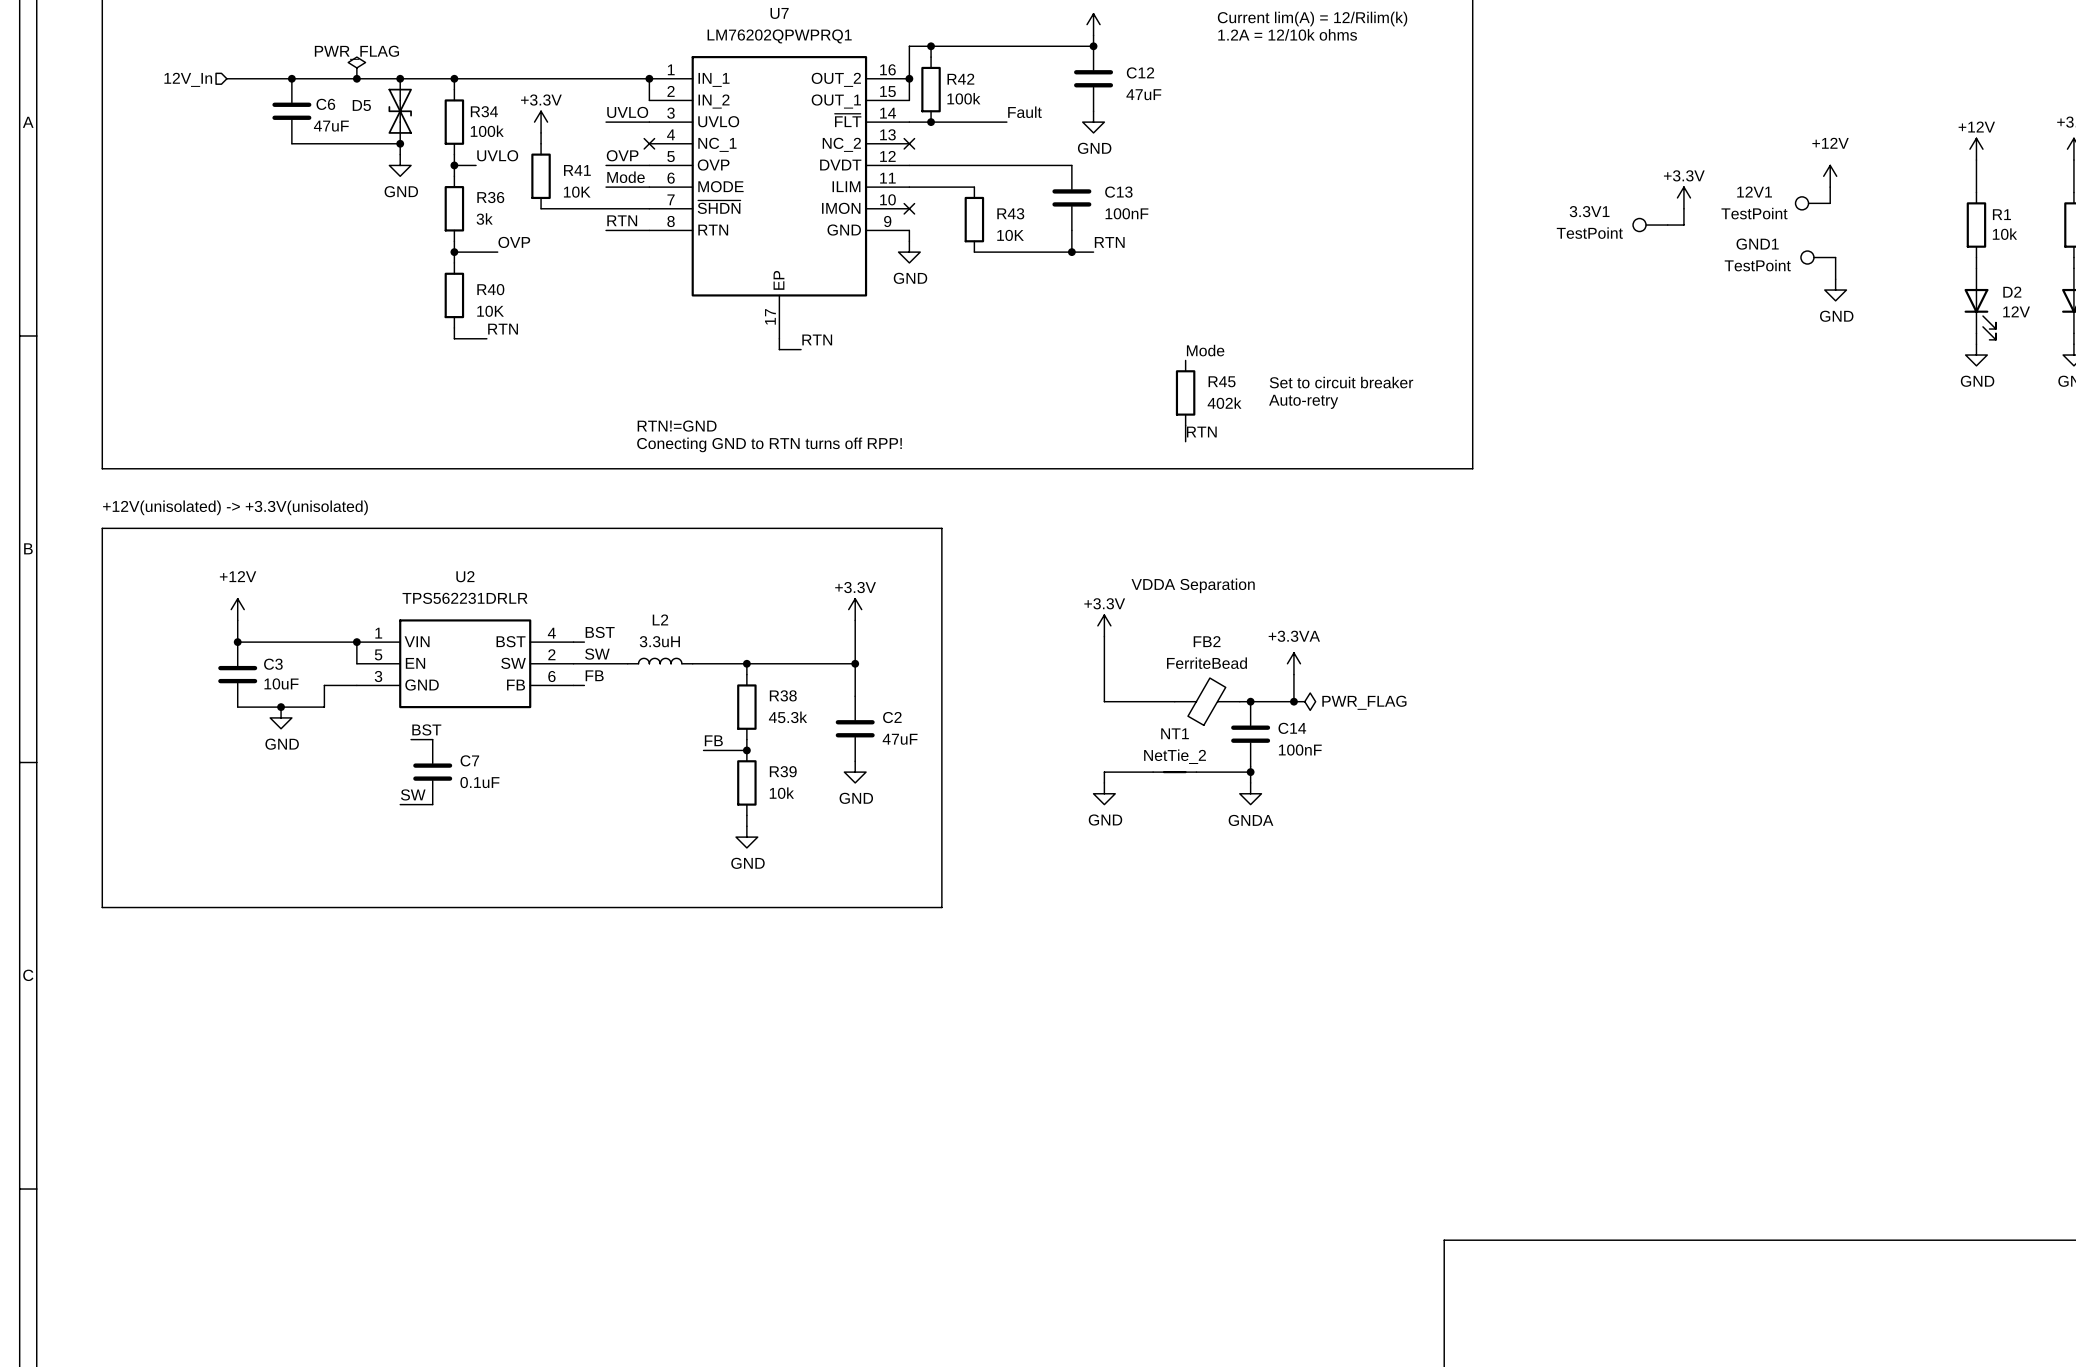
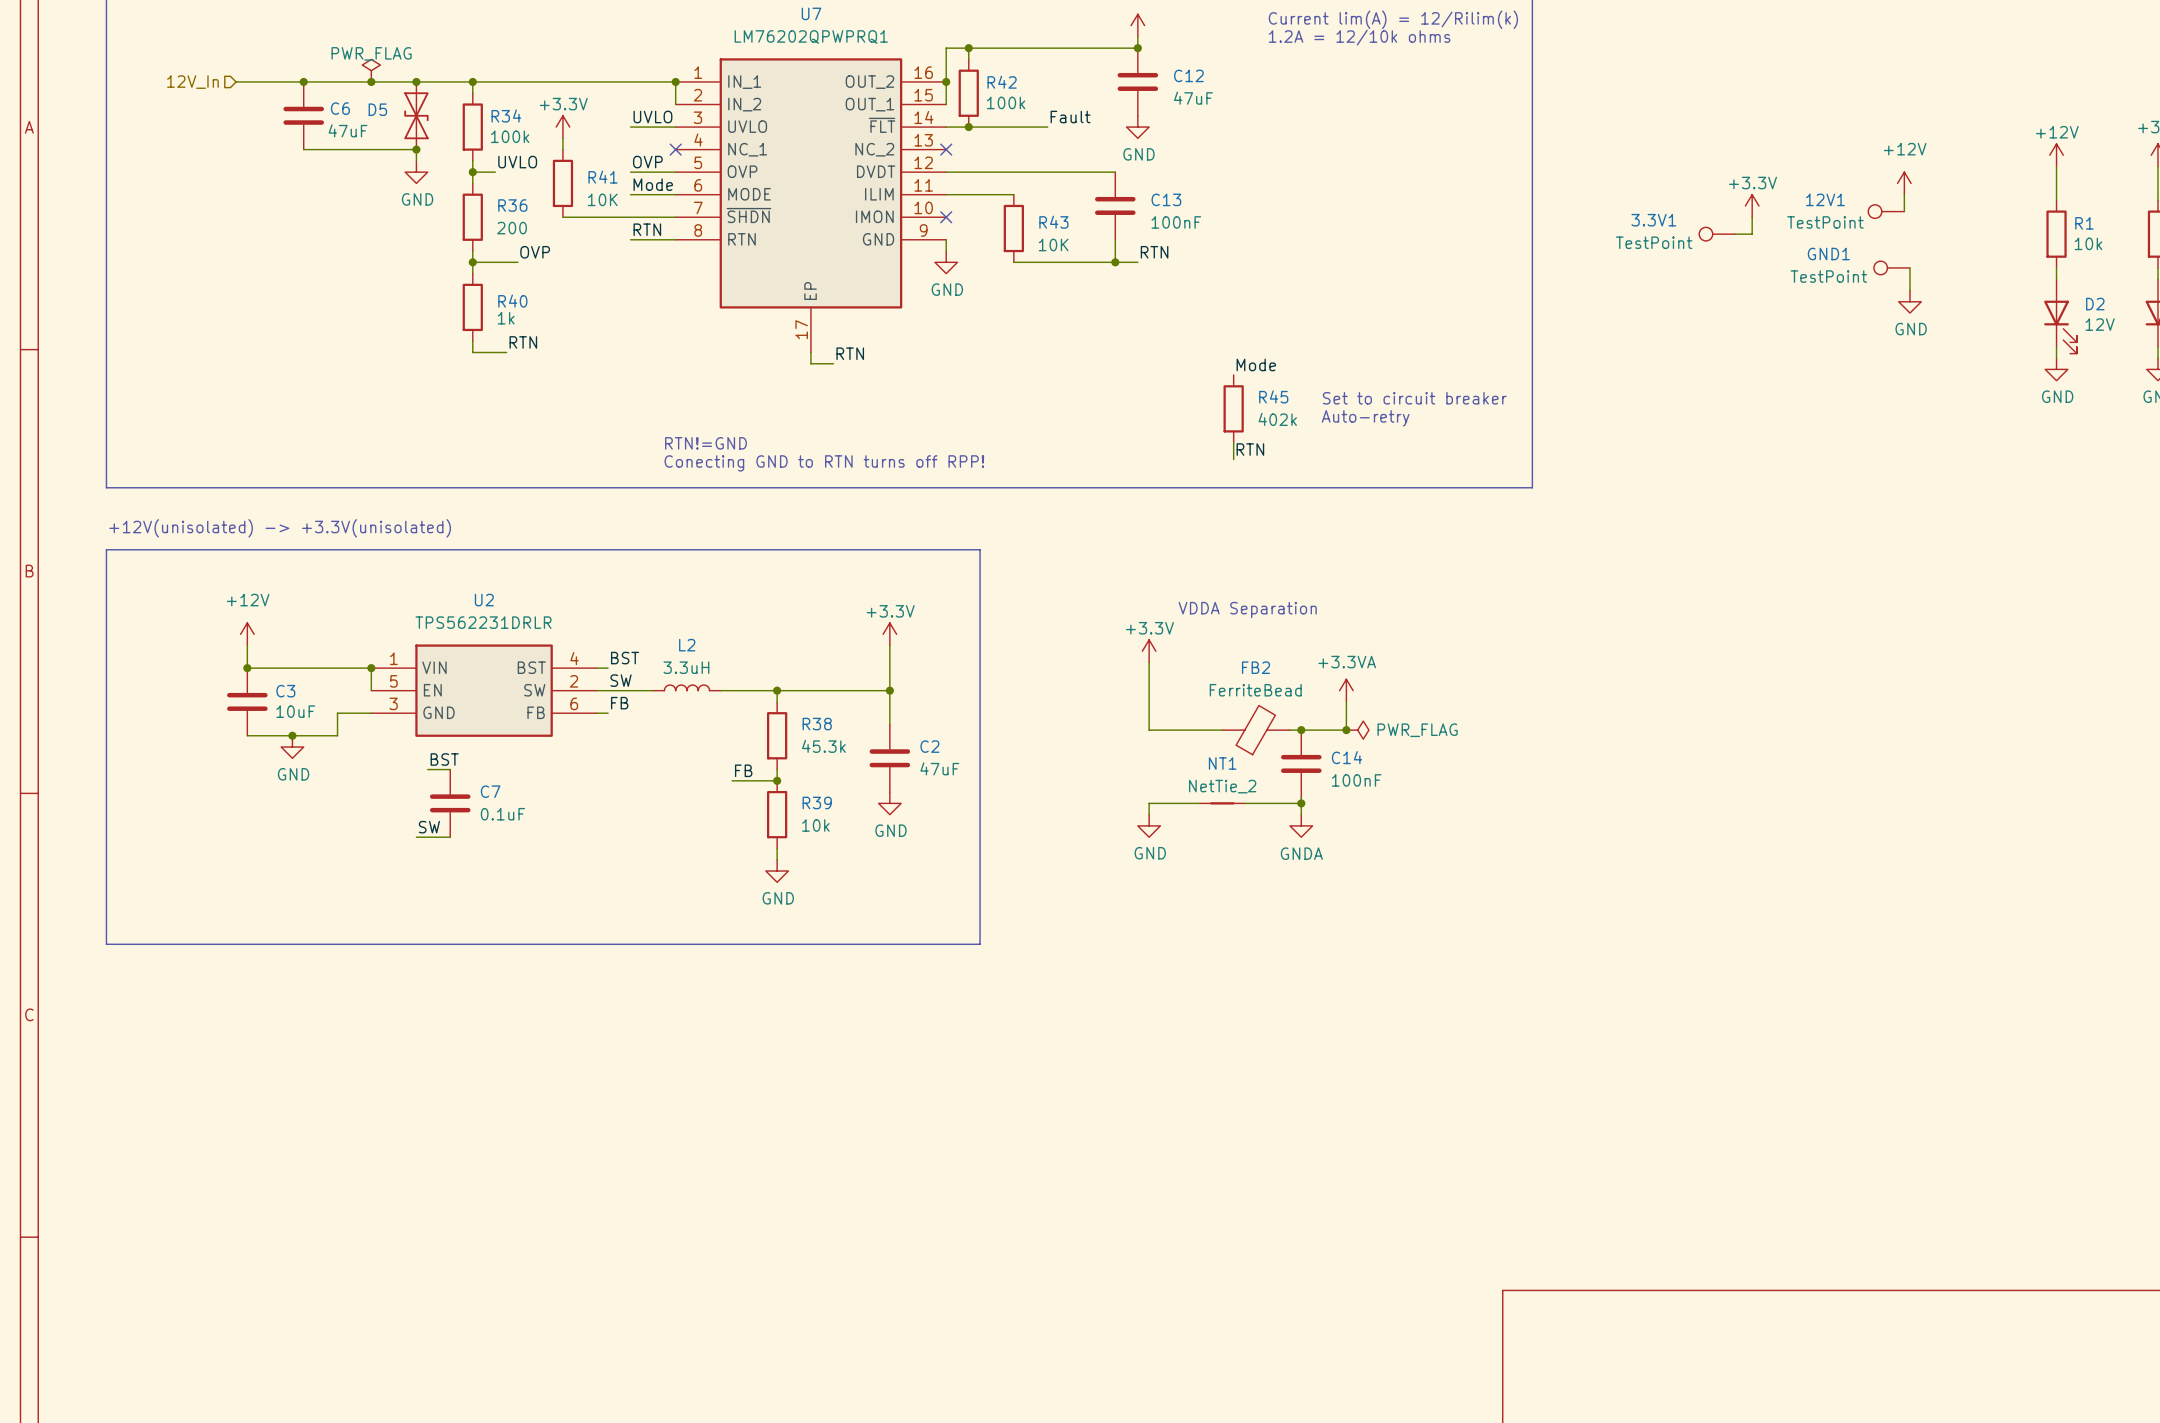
R36 value: 3k (484, 218) -> 200 (512, 228)
R40 value: 10K (490, 311) -> 1k (506, 318)

